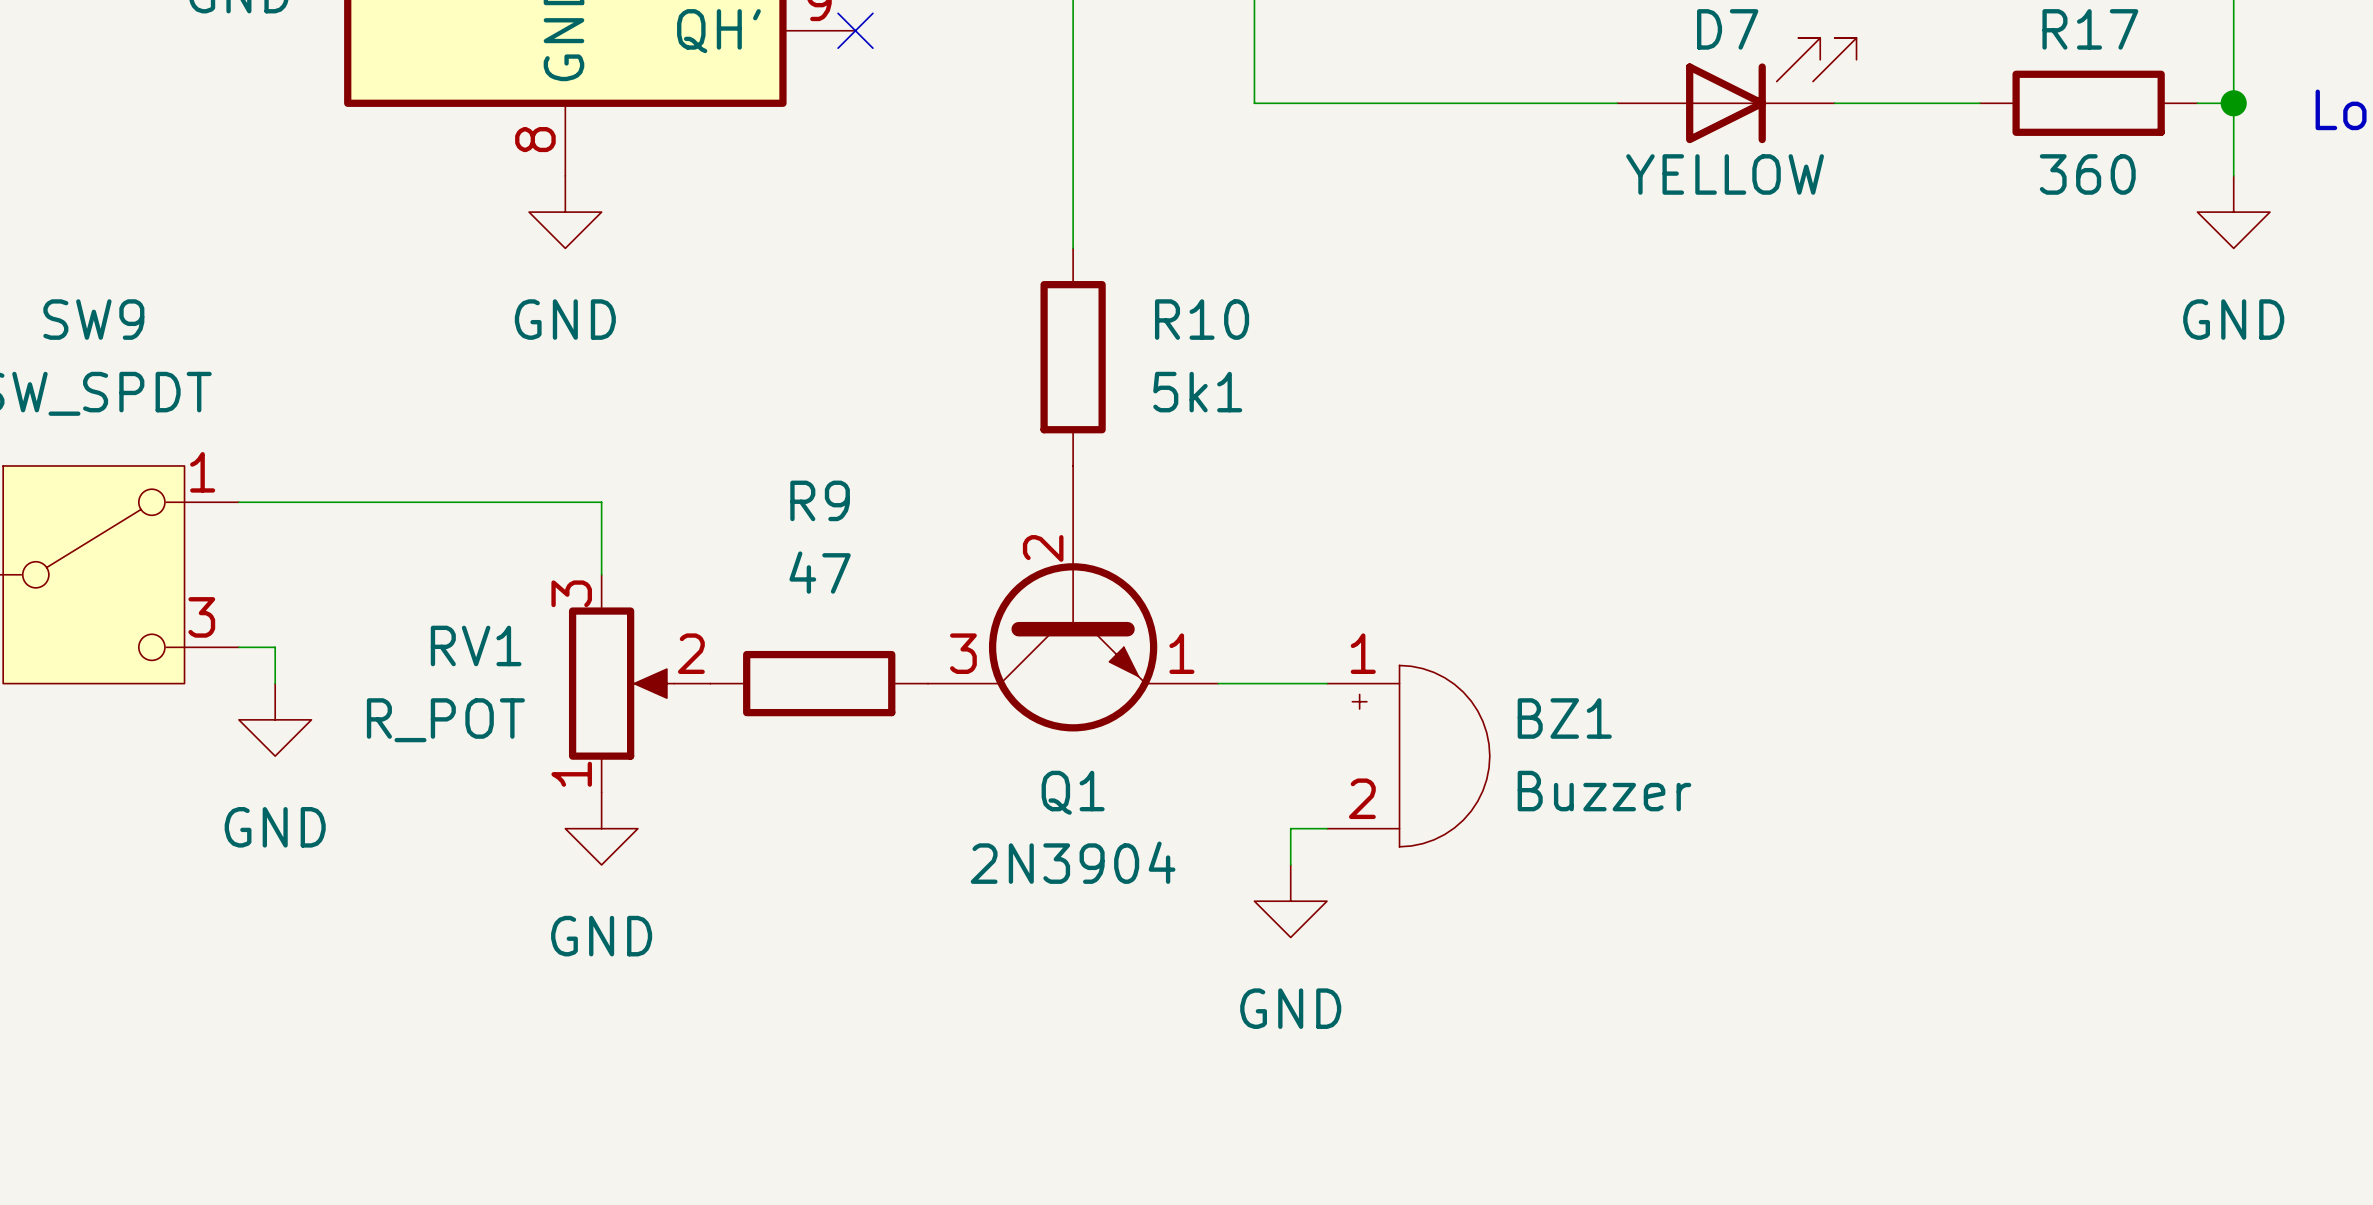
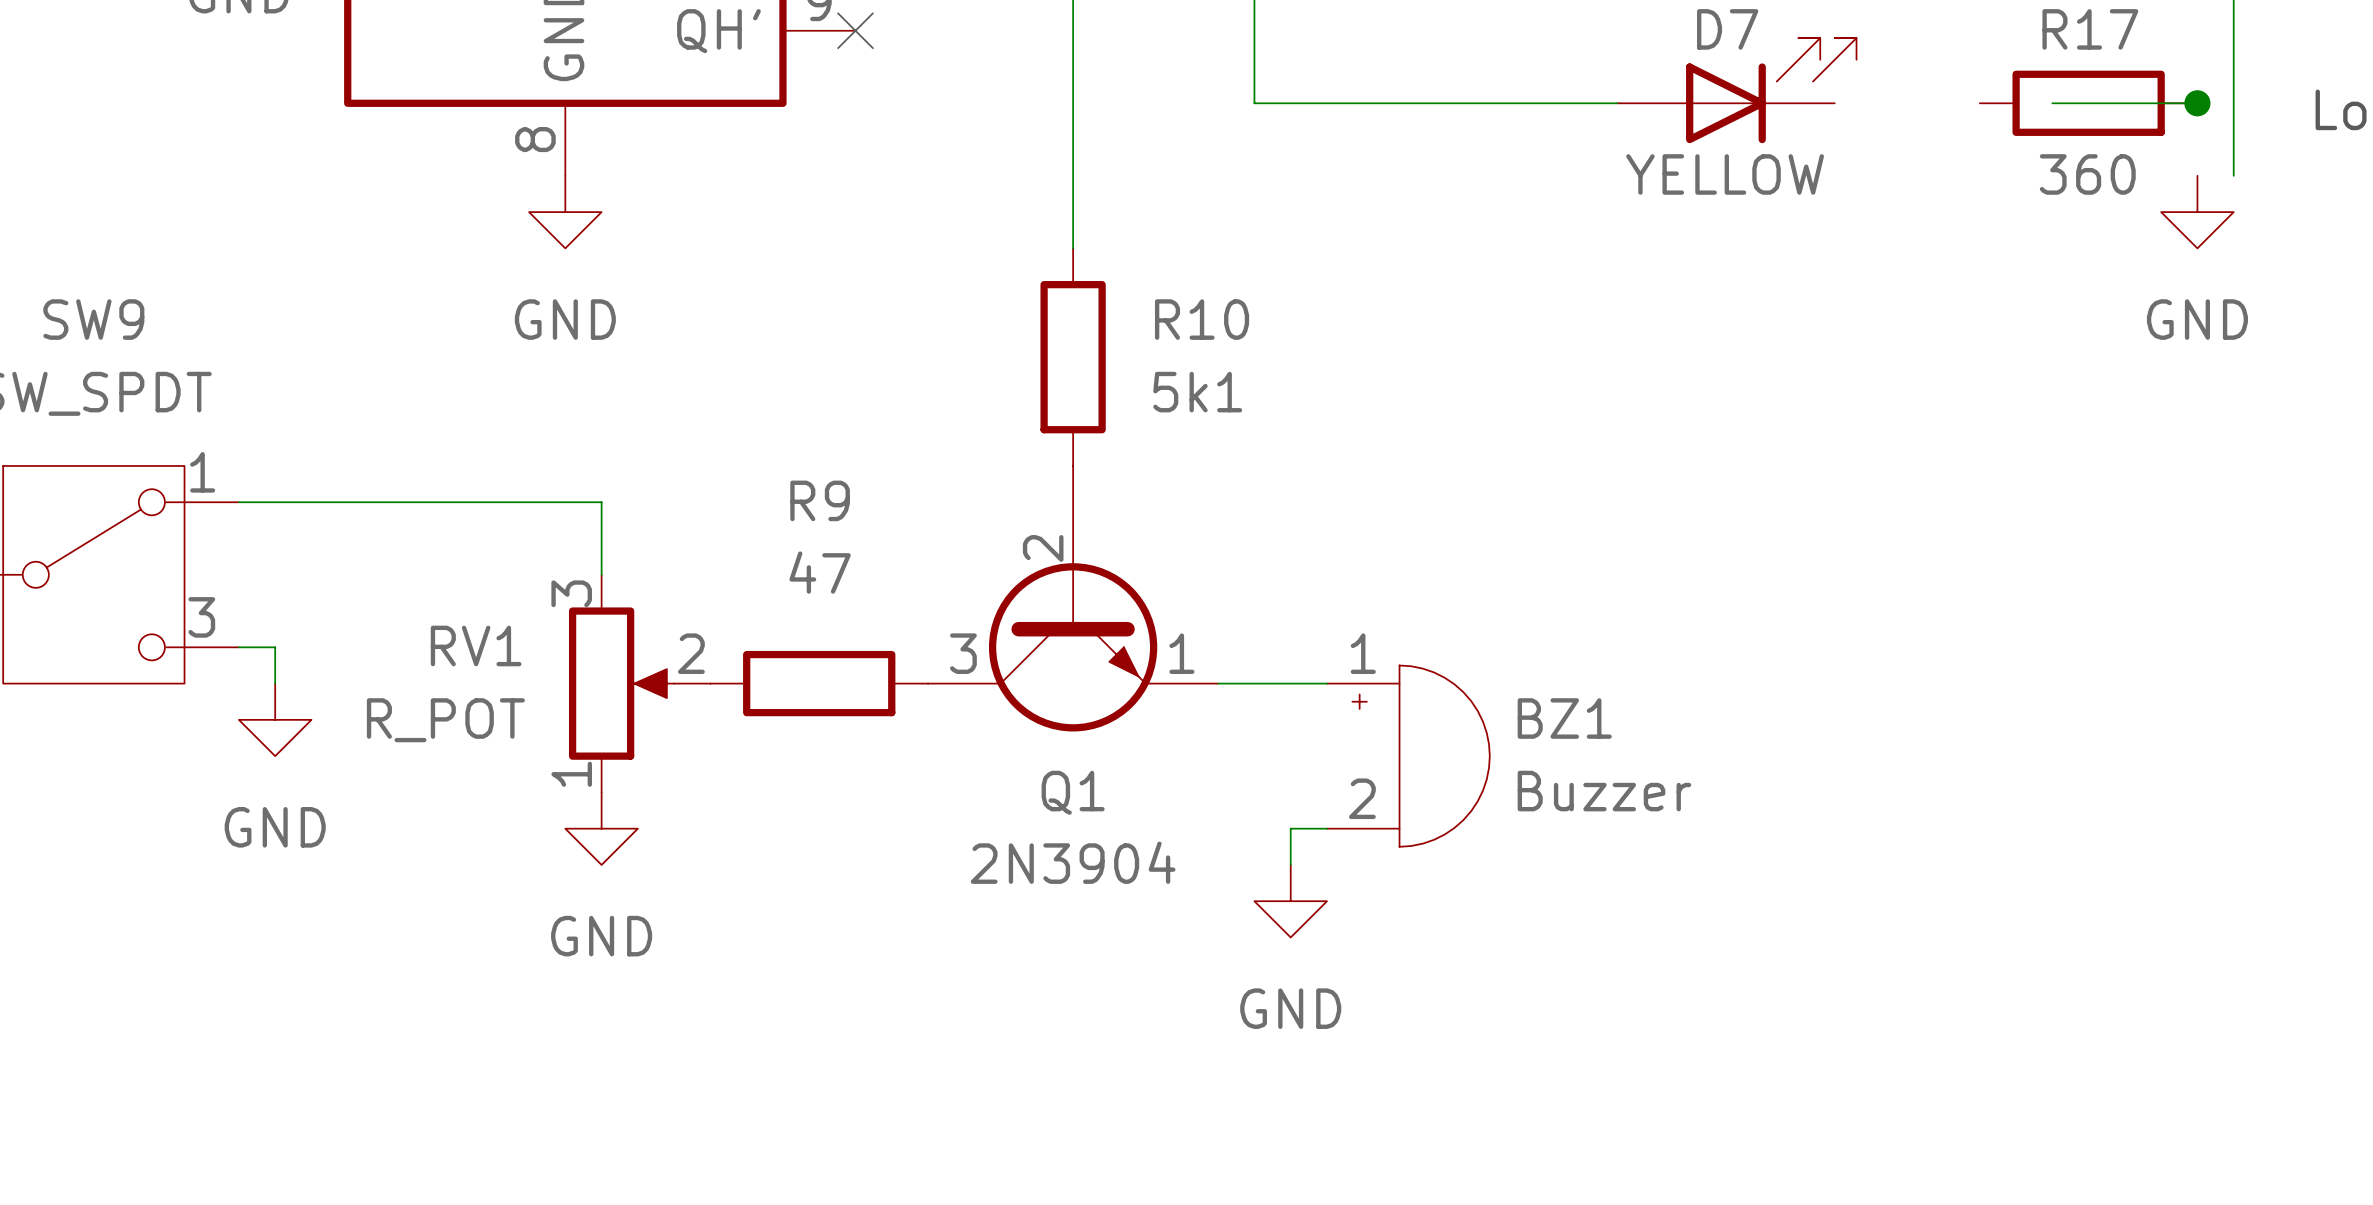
wire: (1834, 103) (1979, 103) -> none
wire: (2197, 103) (2233, 103) -> (2197, 103) (2052, 103)
junction position: (2233, 103) -> (2197, 103)
power symbol position: GND (2233, 212) -> GND (2197, 212)

